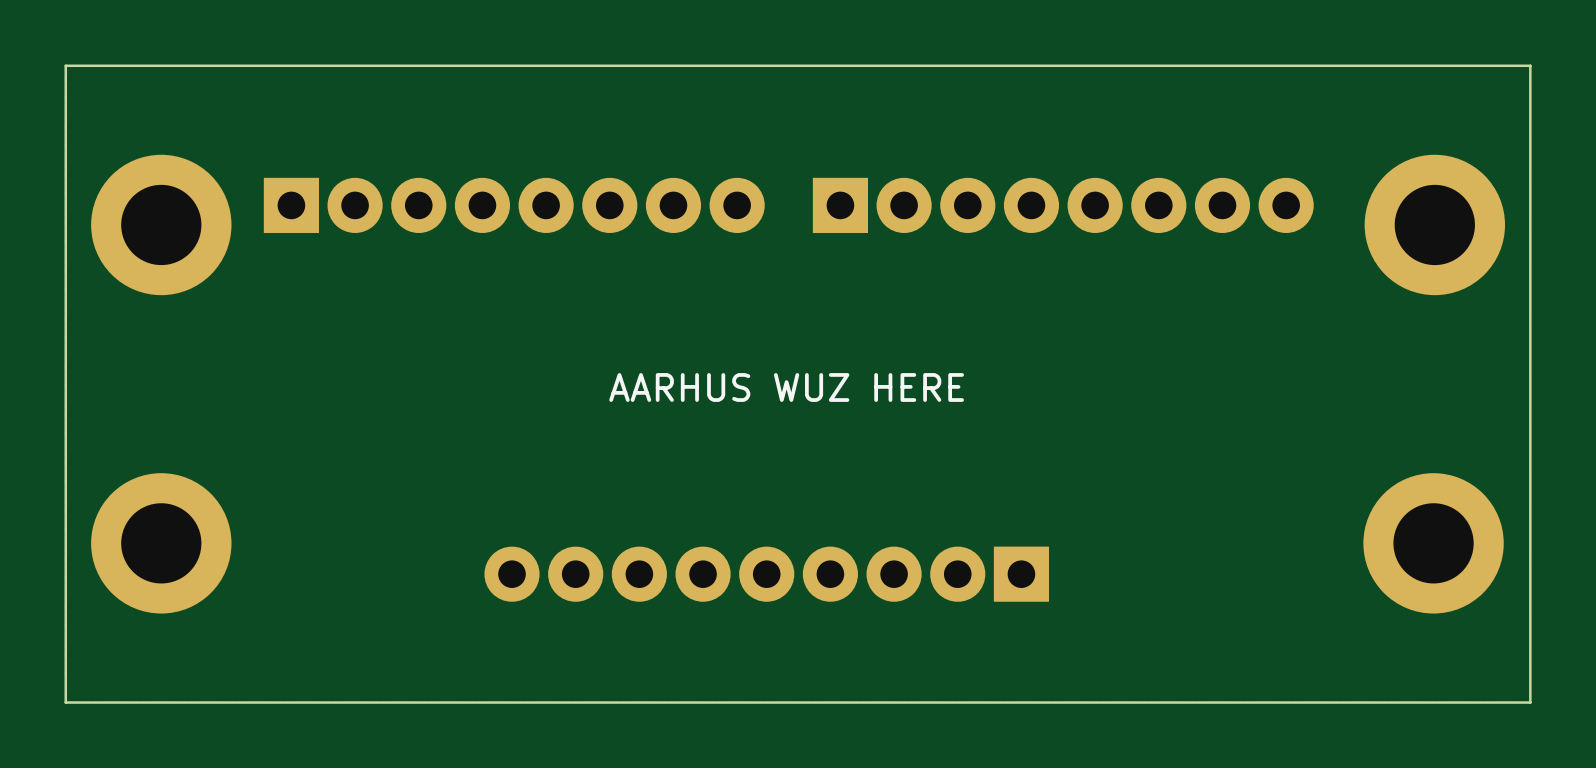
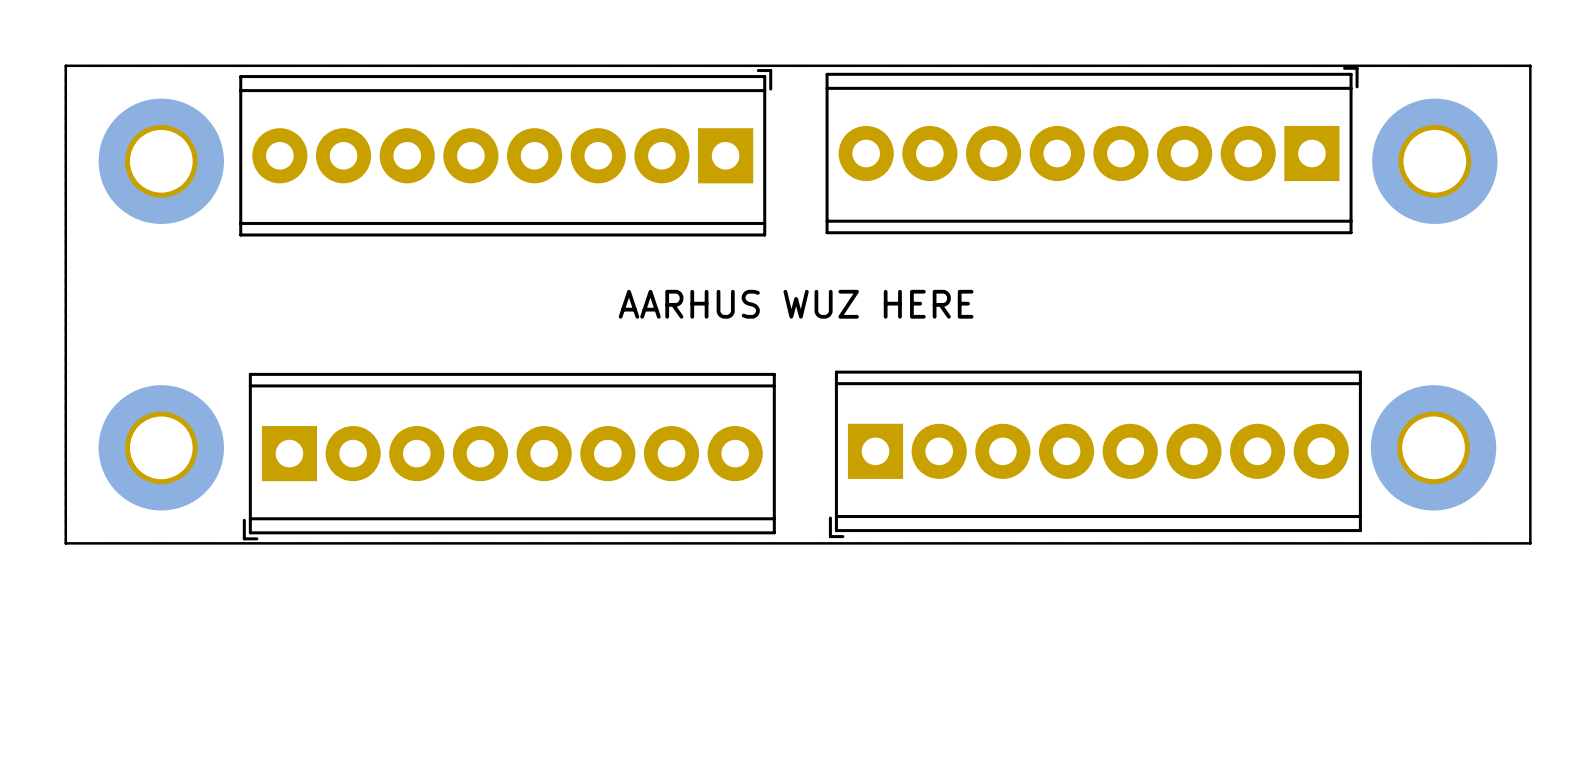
part: none -> (161, 161)
part: none -> (1434, 161)
part side: top (514, 205) -> bottom (1092, 150)
part side: top (1063, 205) -> bottom (505, 152)
part: (161, 224) -> none
part: (1434, 224) -> none
text position: AARHUS WUZ HERE (786, 387) -> AARHUS WUZ HERE (796, 304)
part: none -> (161, 447)
part: none -> (1433, 447)
part: none -> (1095, 454)
part: none -> (509, 456)
part: (161, 543) -> none
part: (1433, 543) -> none
board edge: (1530, 543) (1530, 702) (65, 702) (65, 543) -> (1530, 543) (65, 543)
part: (766, 574) -> none

